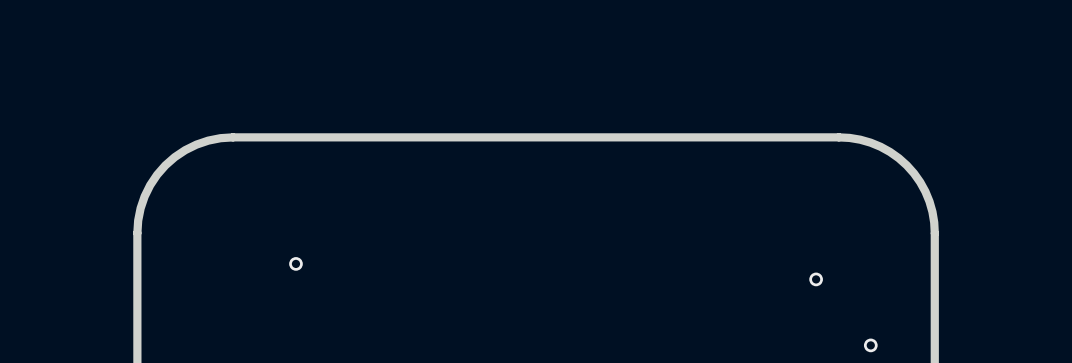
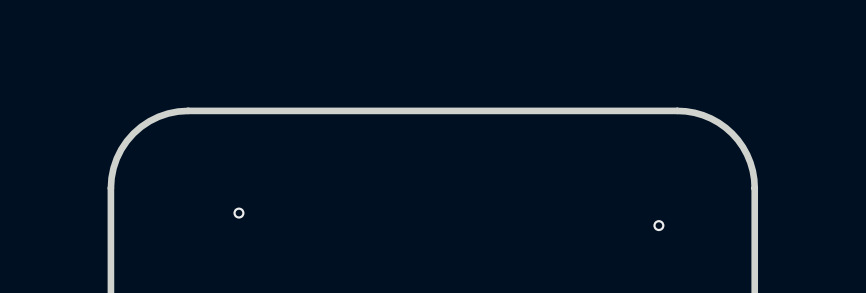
via: (870, 345) -> none

